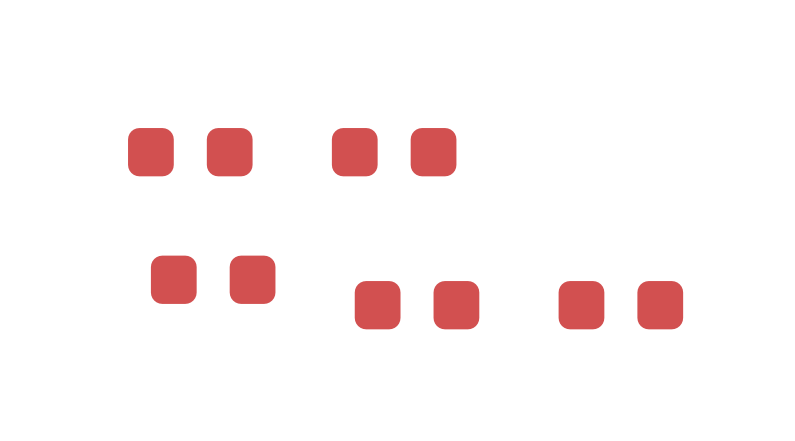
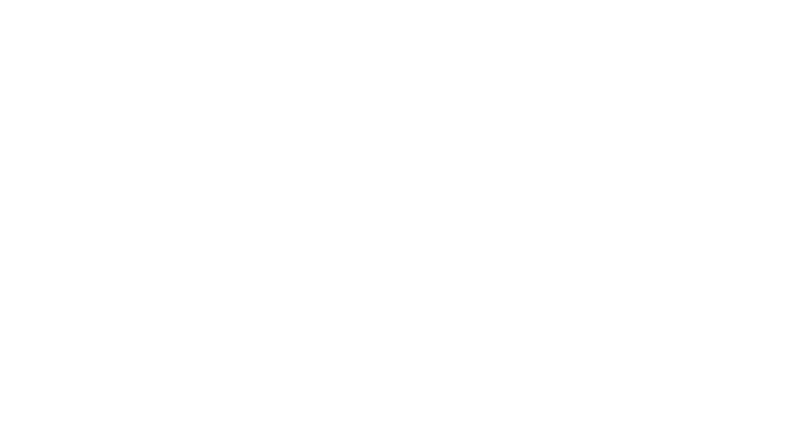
part: (190, 152) -> none
part: (394, 152) -> none
part: (213, 279) -> none
part: (417, 305) -> none
part: (620, 305) -> none

